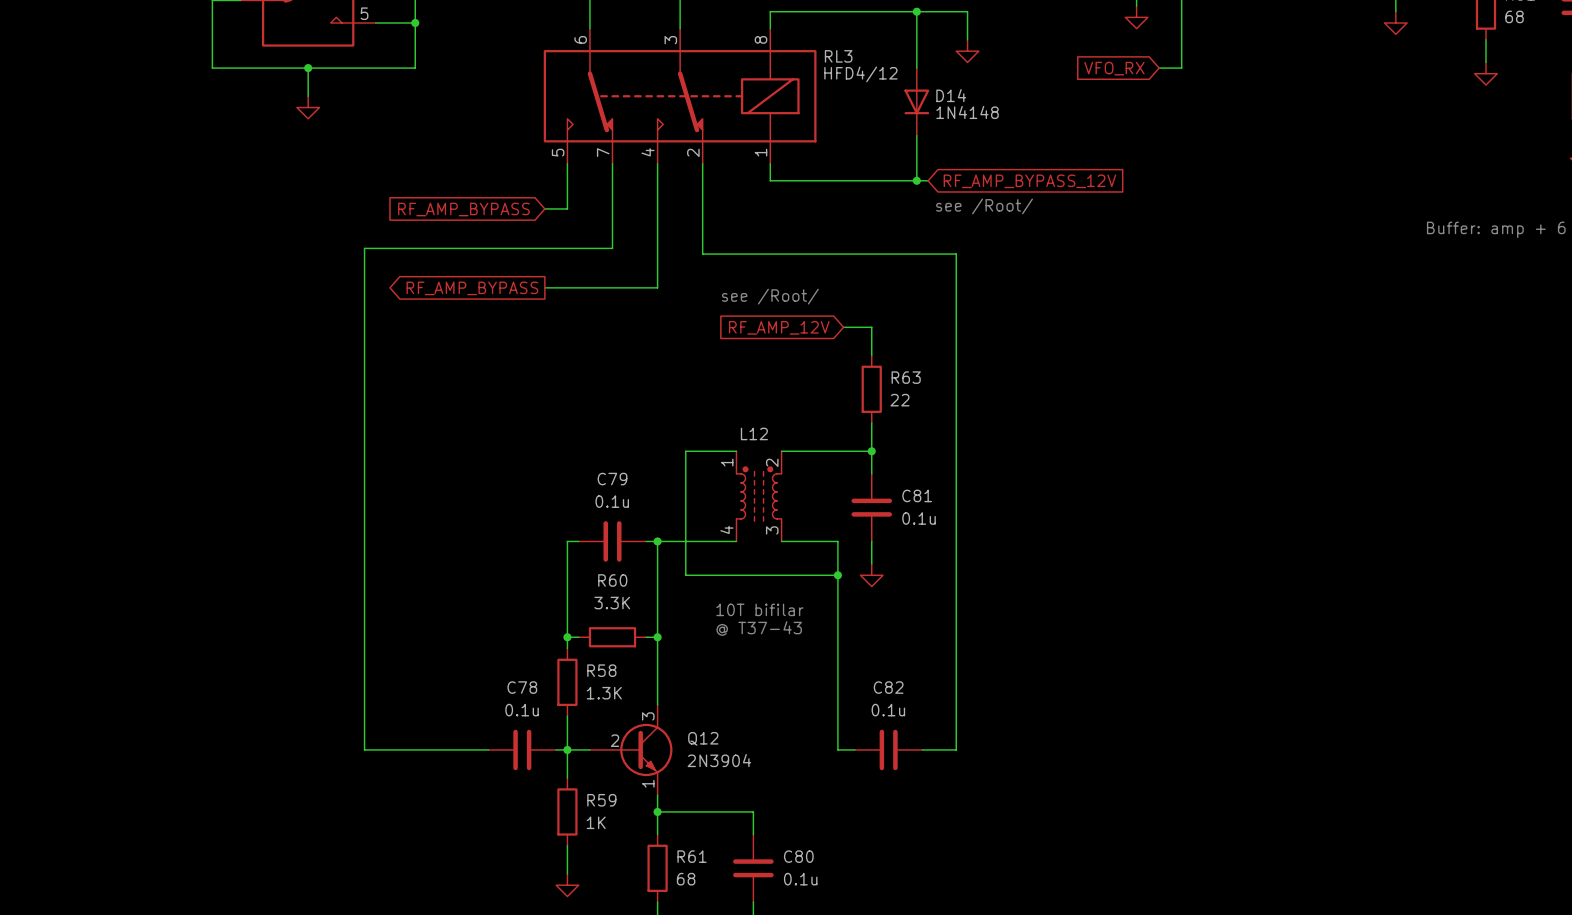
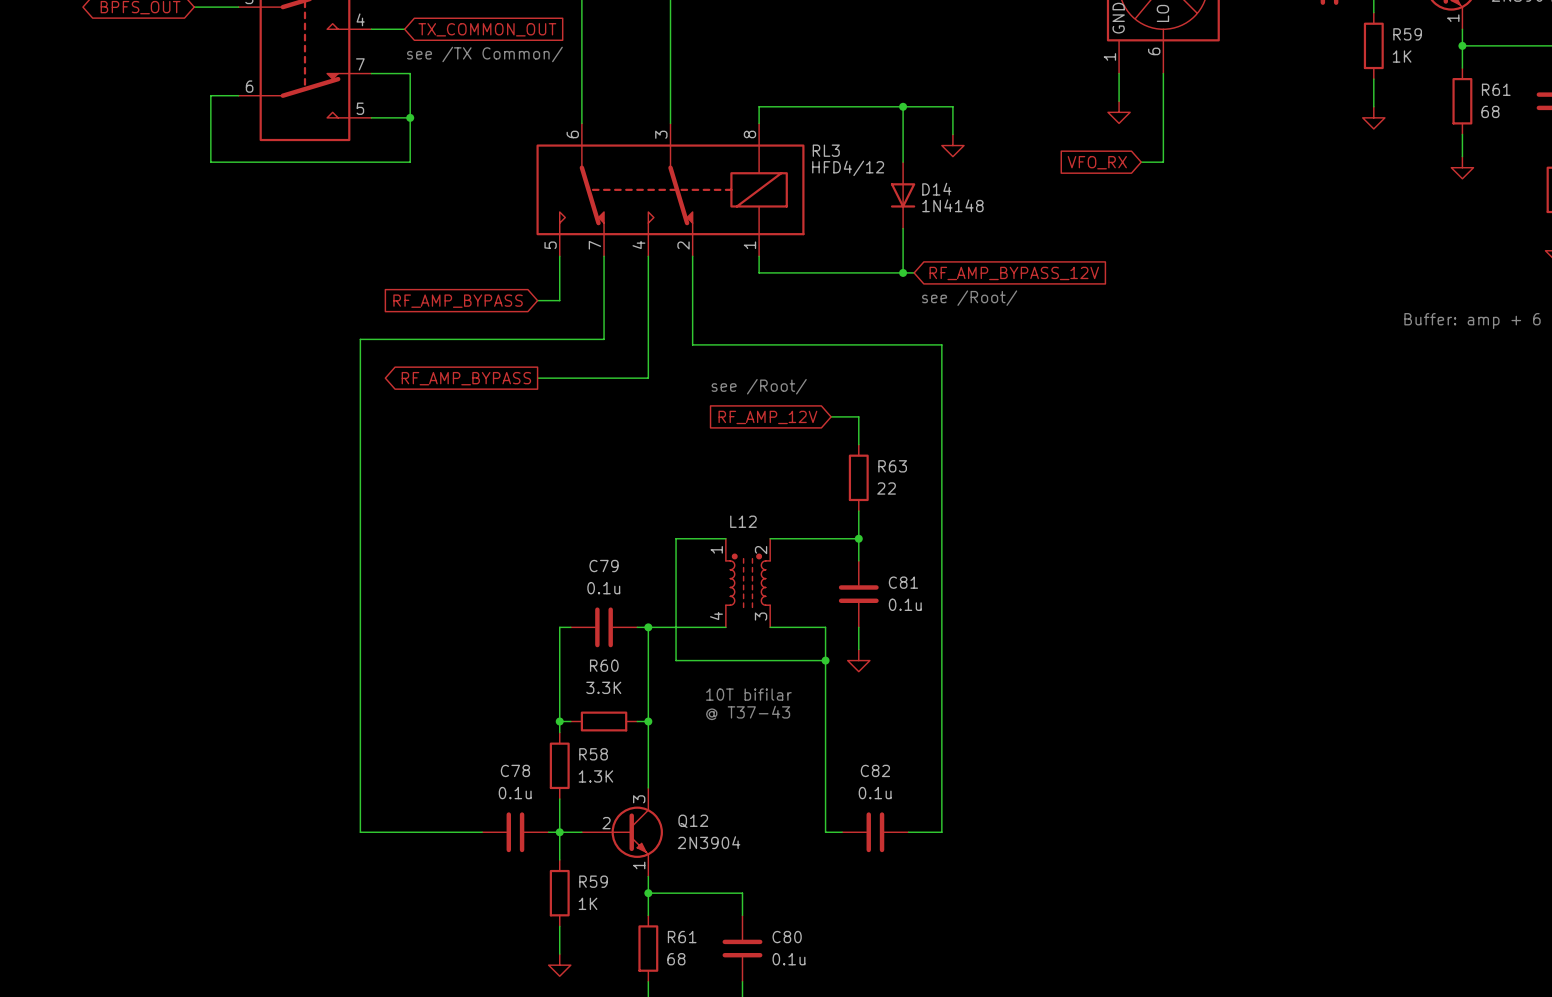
wire: (308, 68) (308, 96) -> none
junction: (308, 68) -> none
power symbol: (308, 107) -> none

